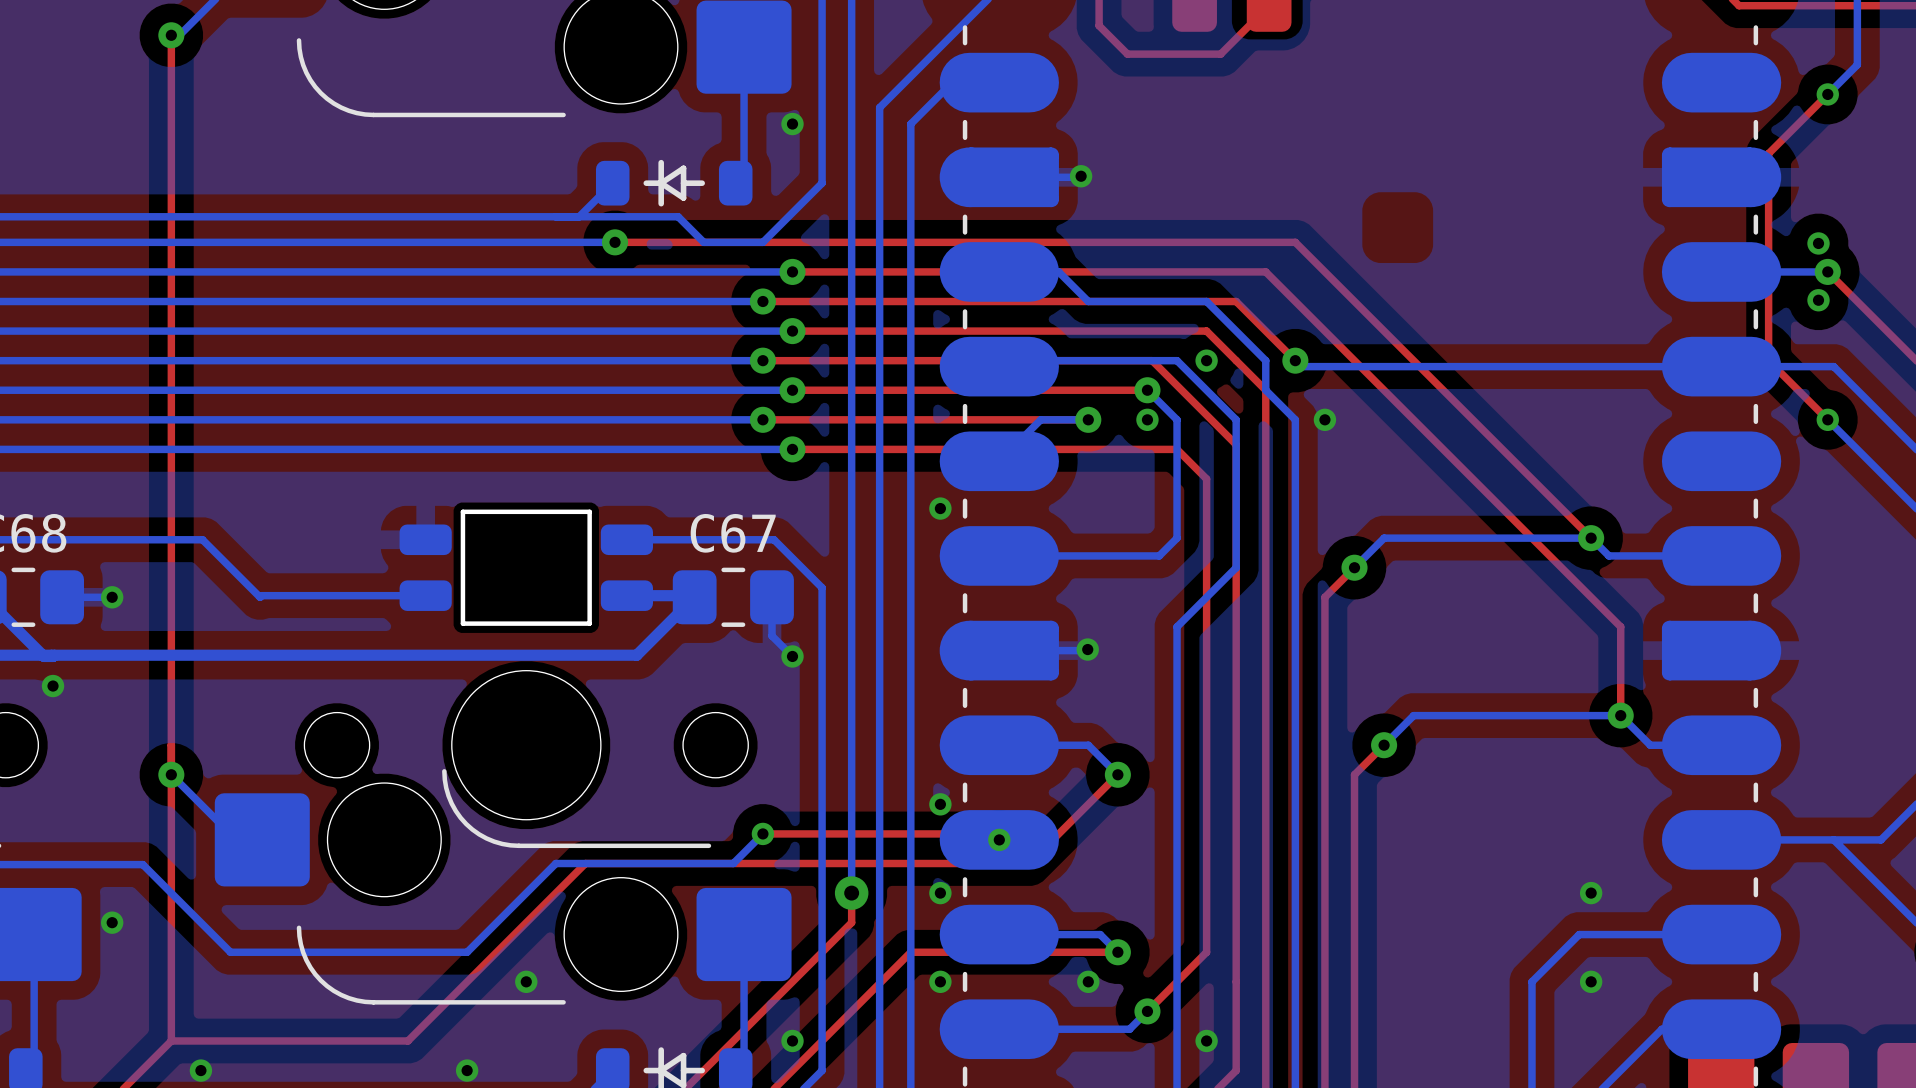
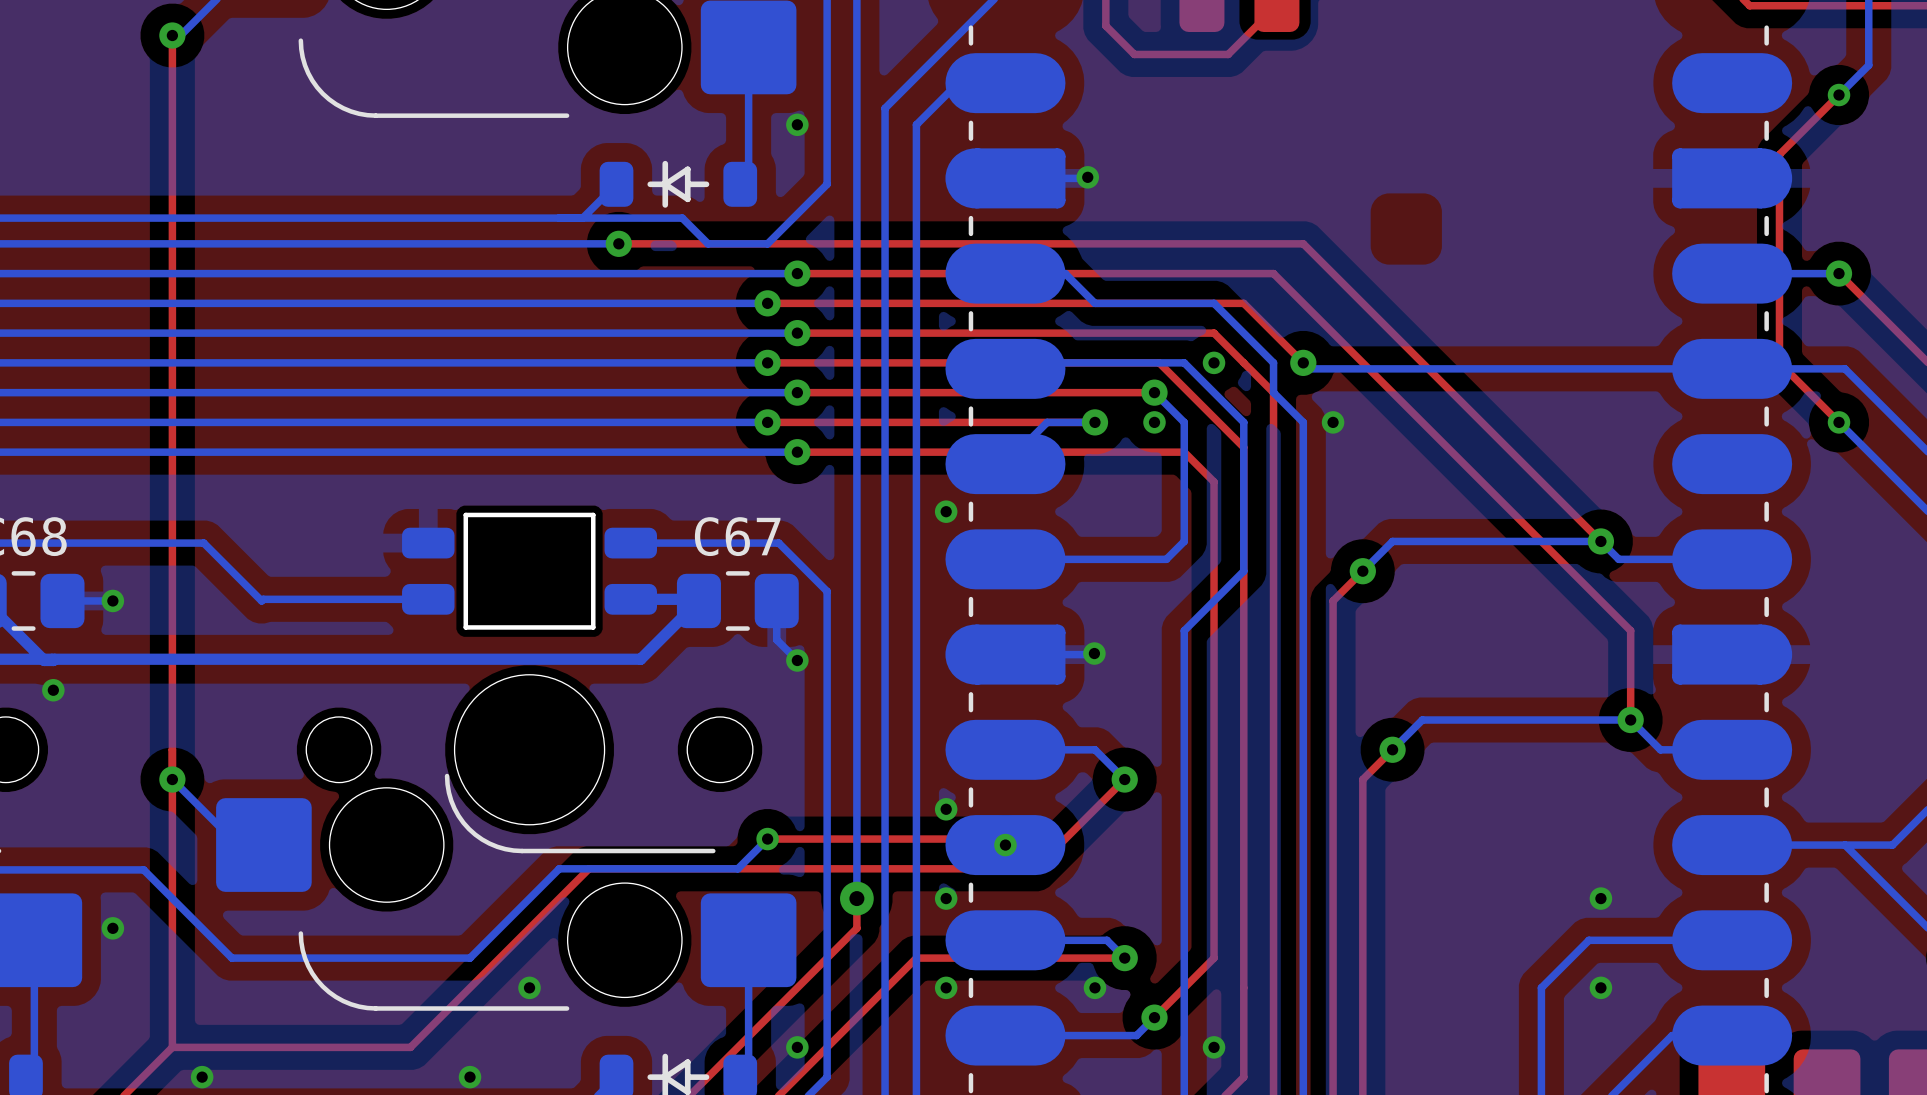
via: (1818, 243) -> none
via: (1818, 300) -> none

